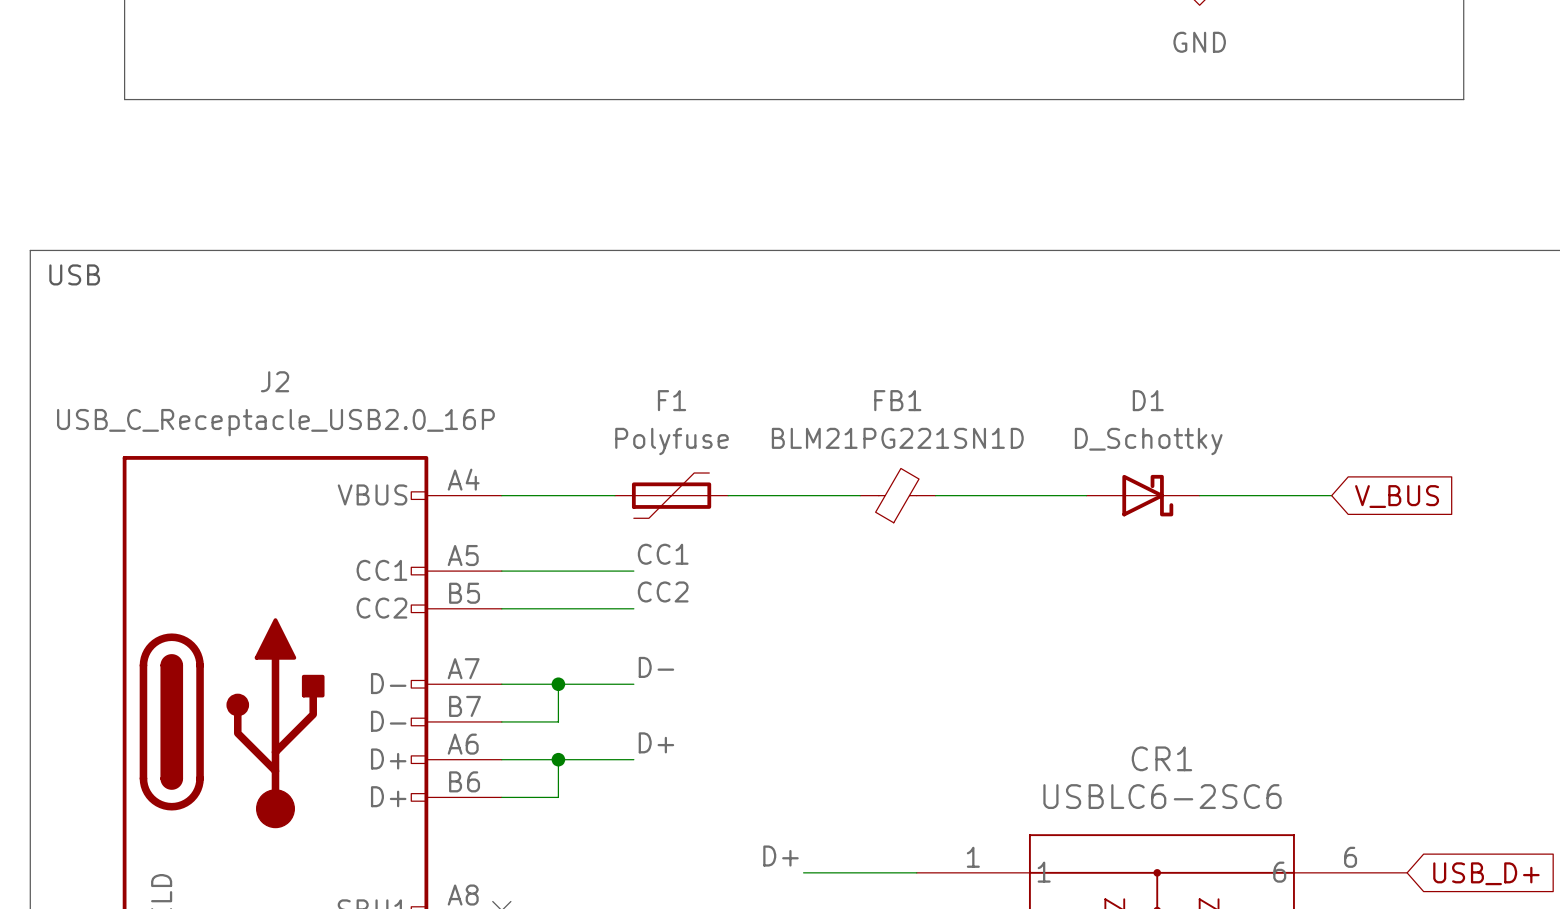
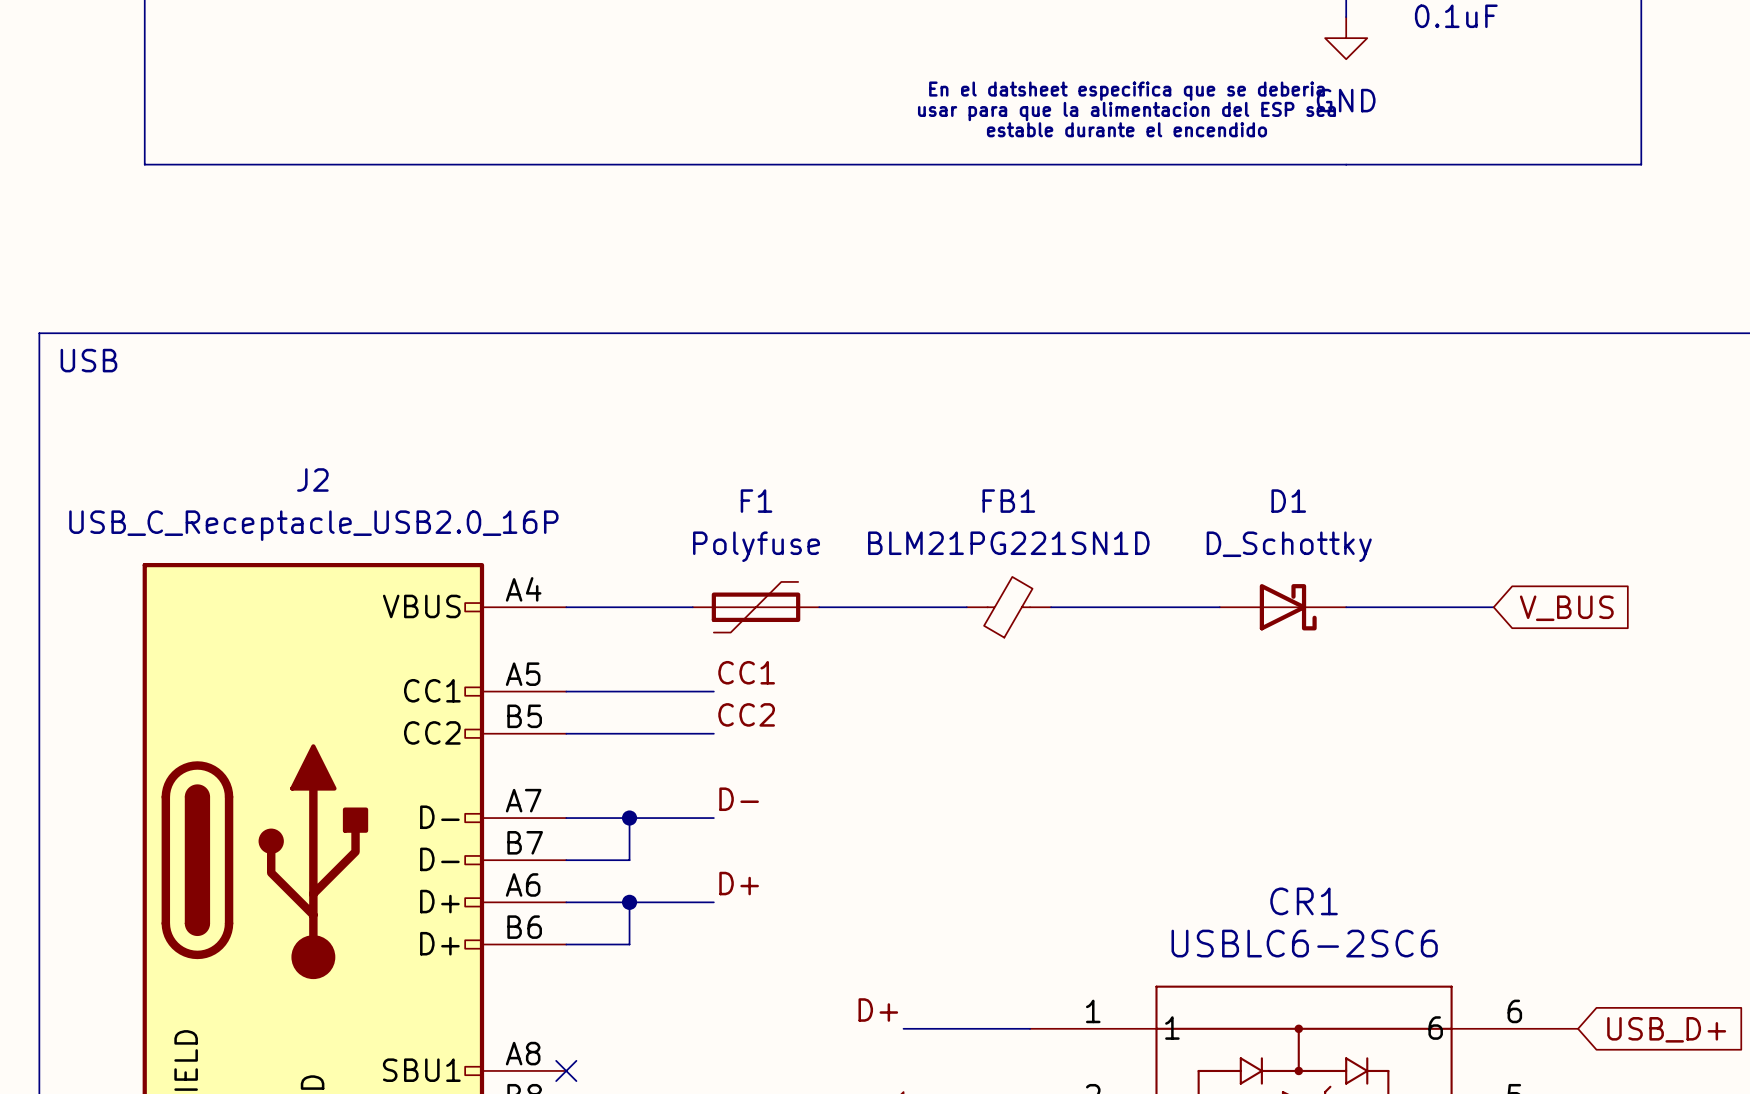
text: none -> En el datsheet especifica que se deberia (1126, 91)
text: none -> usar para que la alimentacion del ESP sea (1126, 111)
text: none -> estable durante el encendido (1126, 129)

